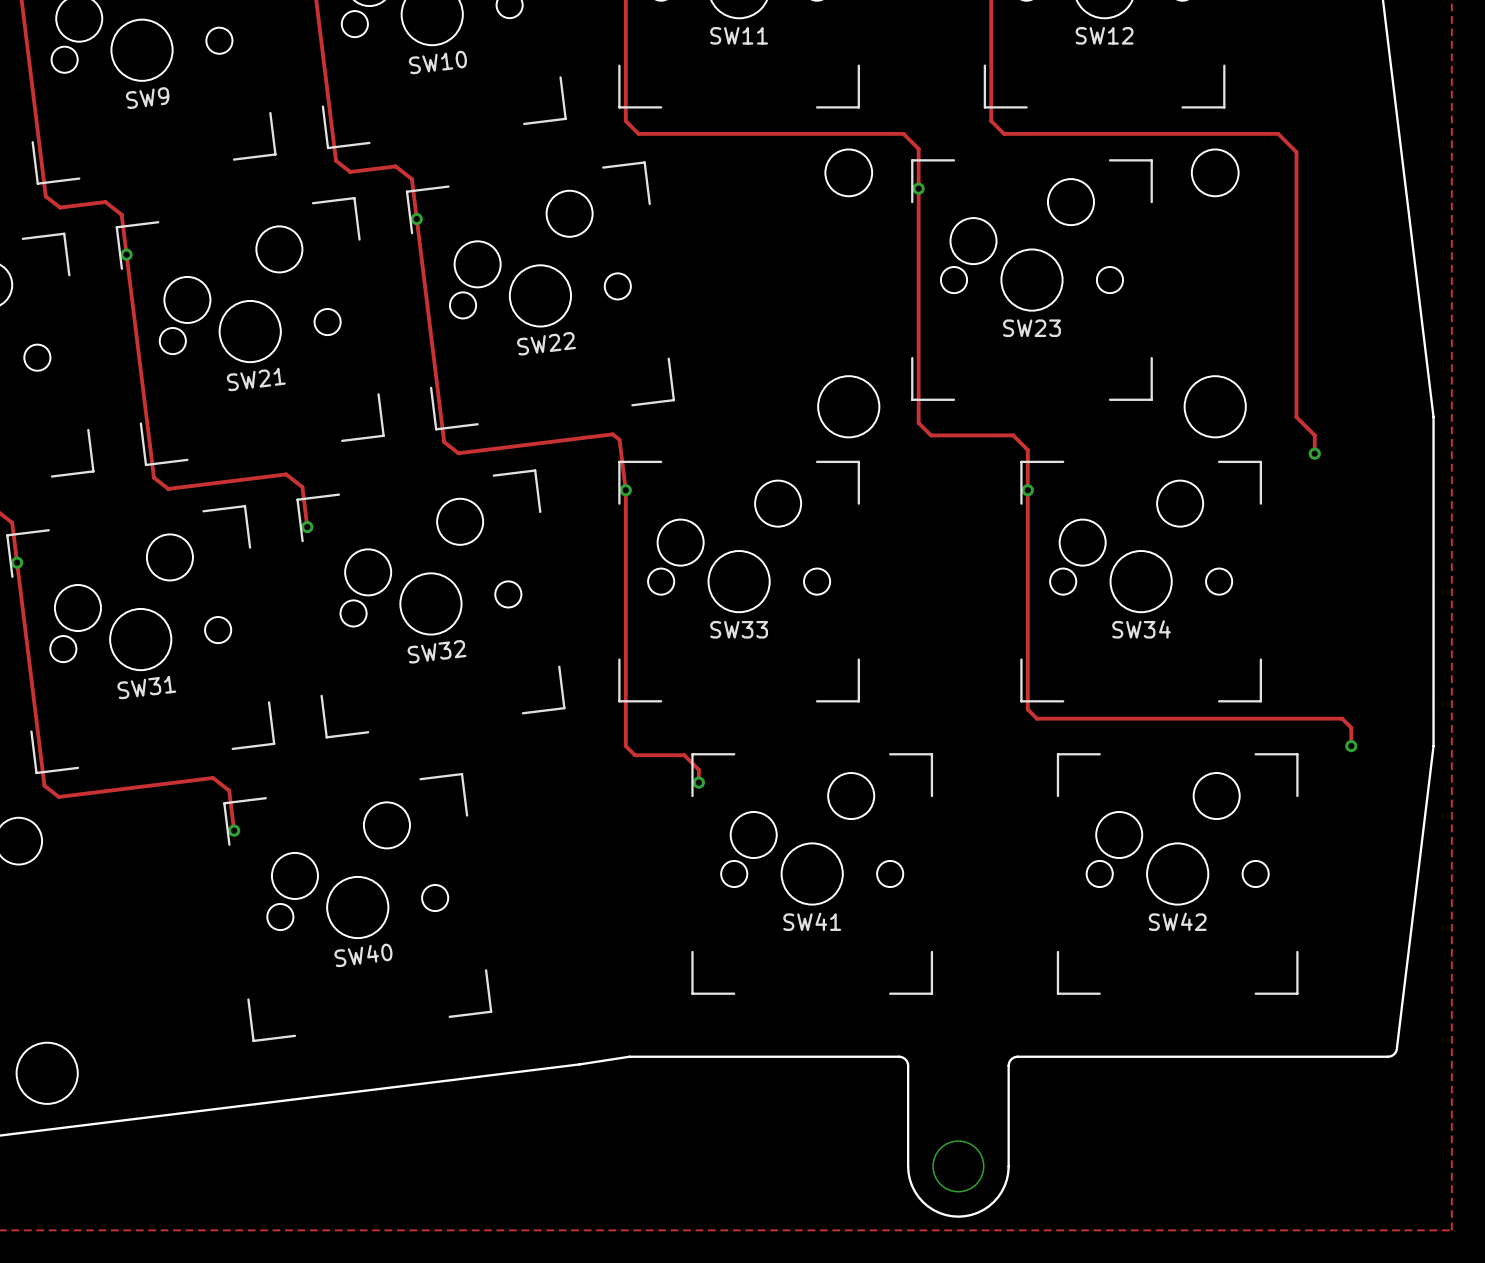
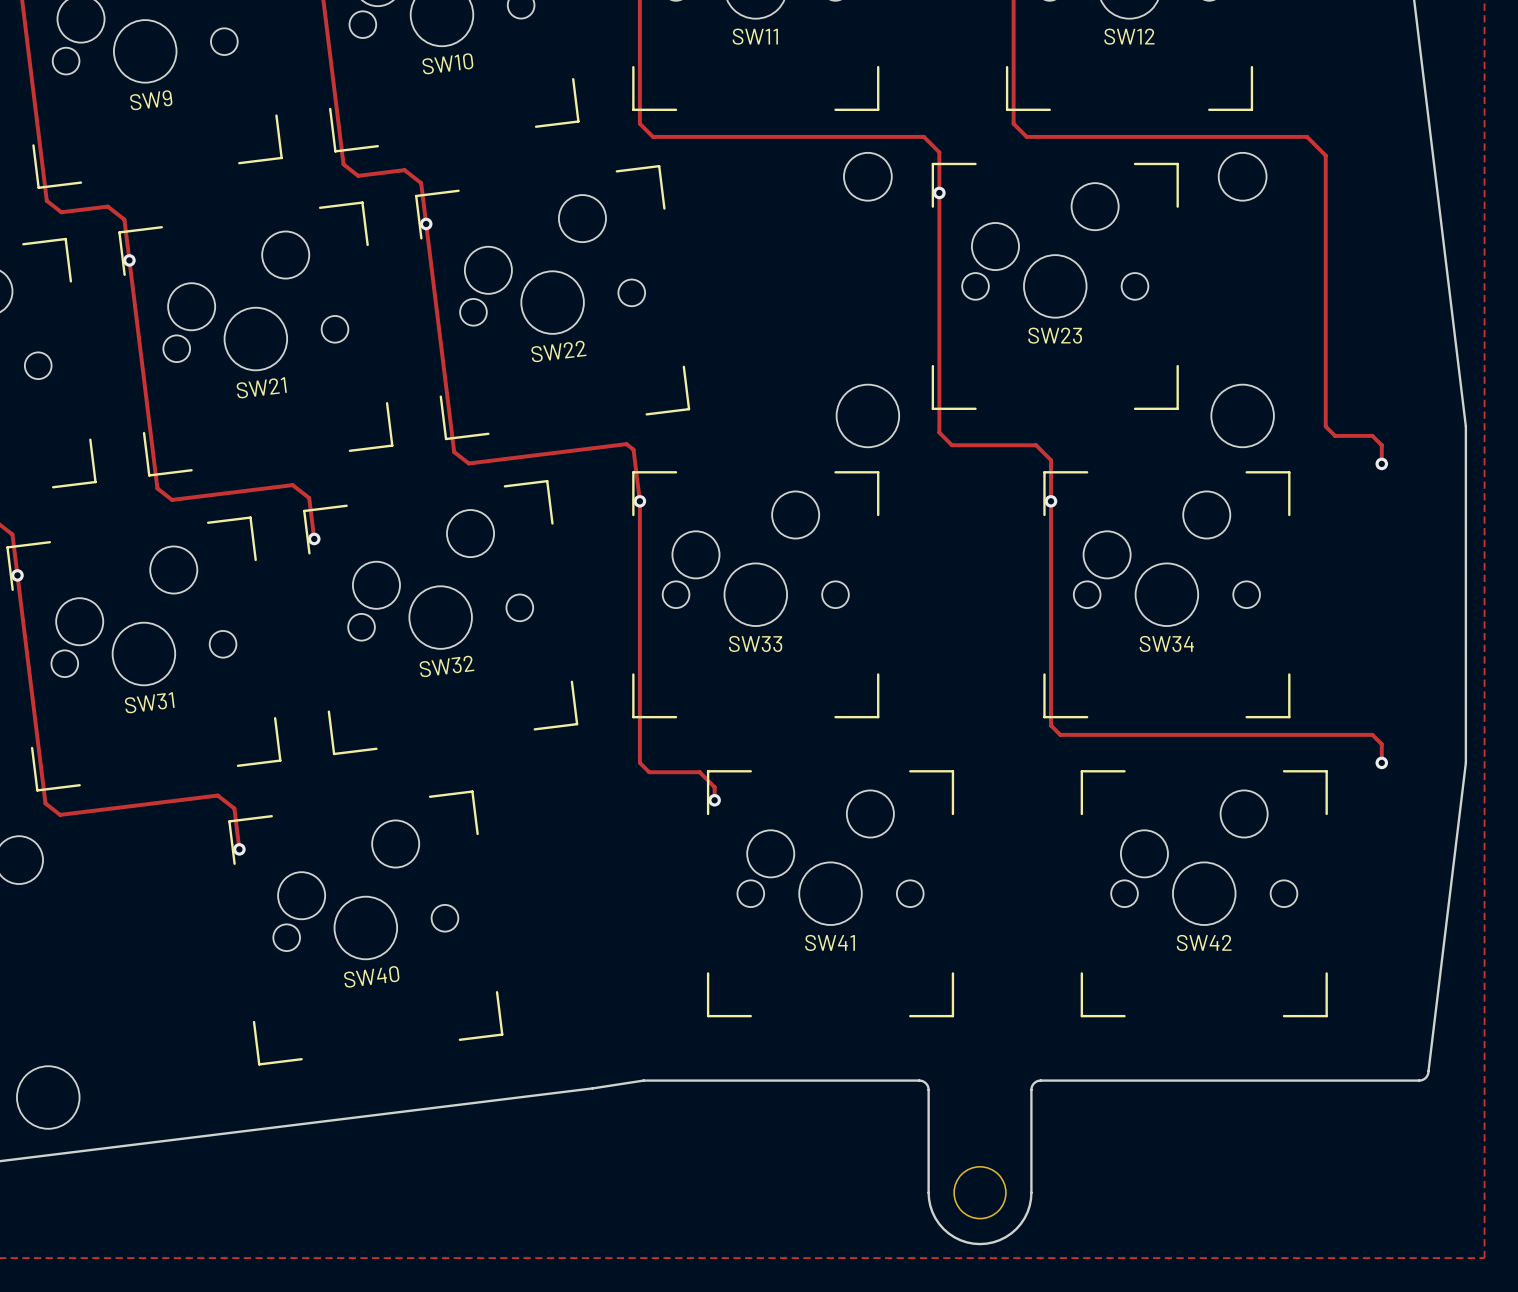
track: (1305, 426) (1314, 435) (1314, 453) -> (1335, 435) (1372, 435) (1381, 445) (1381, 463)
via position: (1314, 453) -> (1381, 463)

